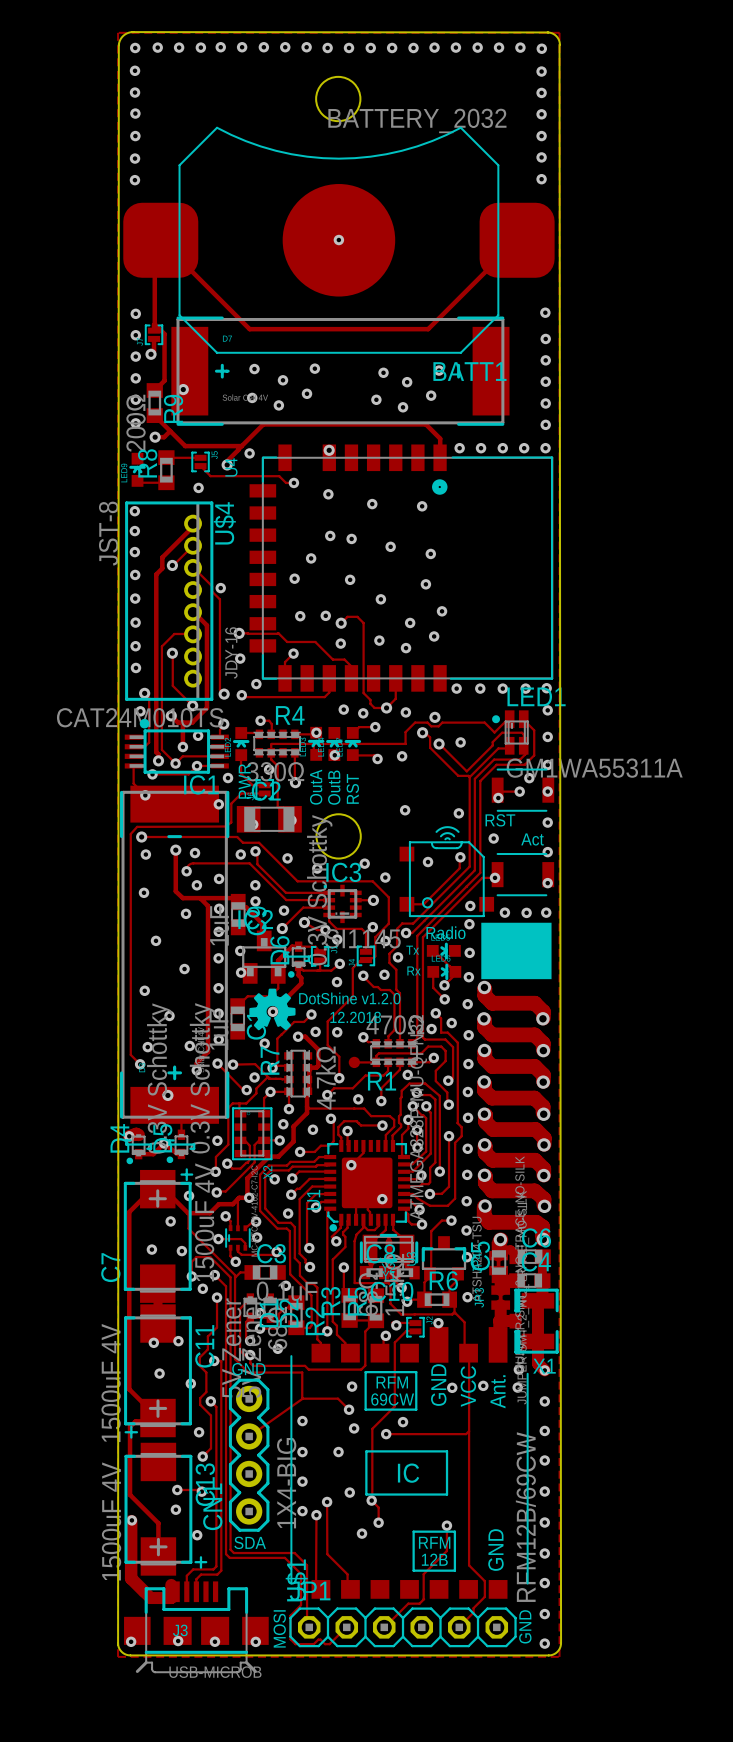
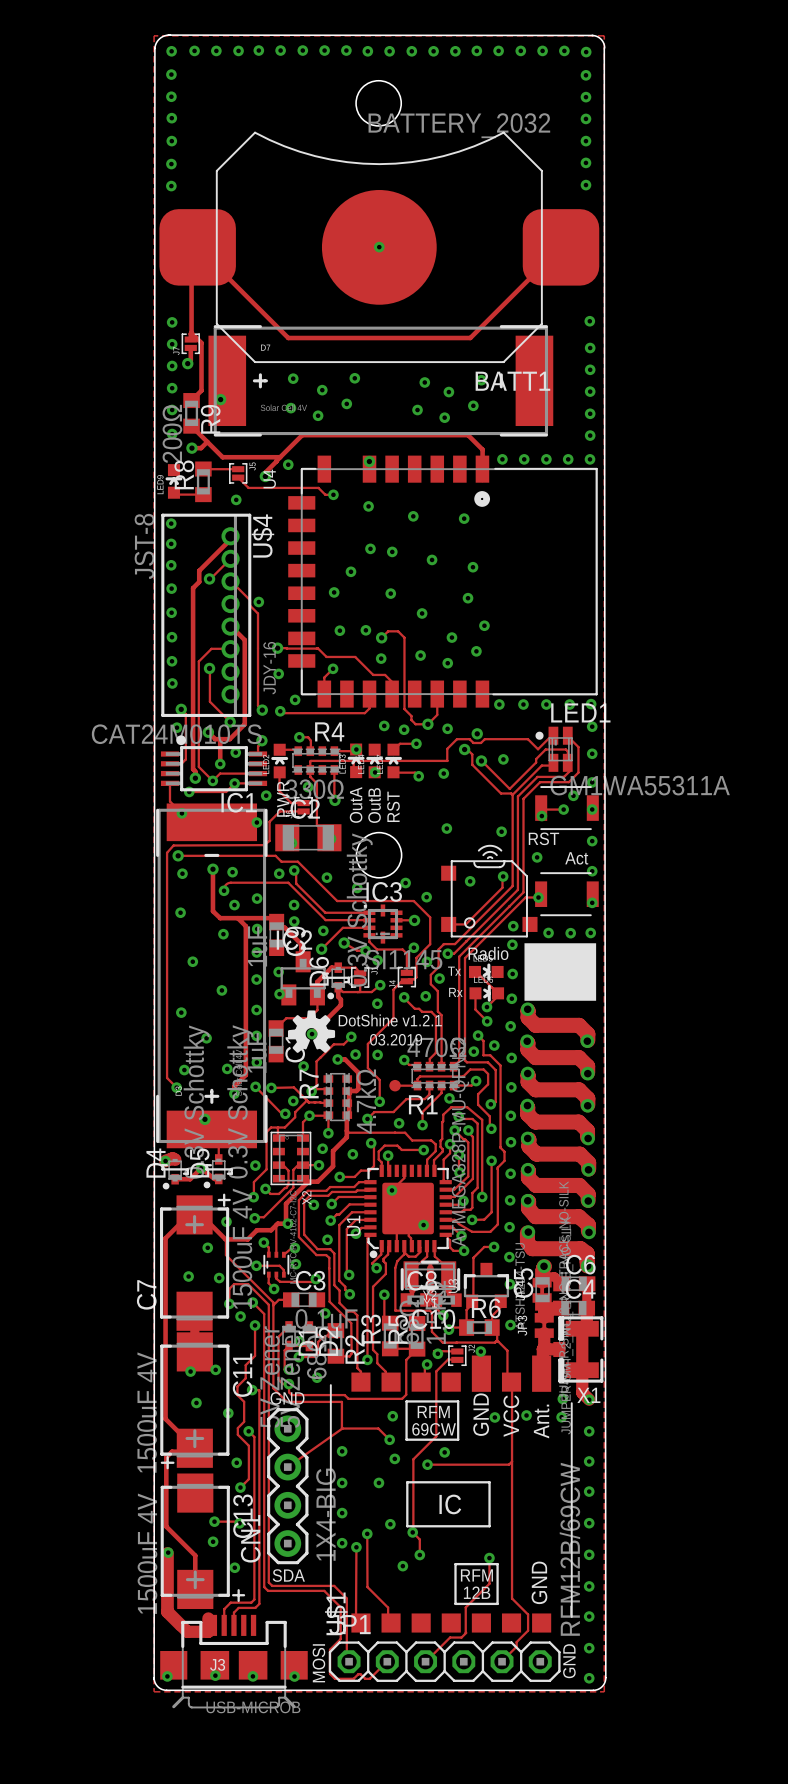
text: DotShine v1.2.0 (349, 998) -> DotShine v1.2.1 (390, 1020)
text: 12.2018 (355, 1017) -> 03.2019 (396, 1039)

